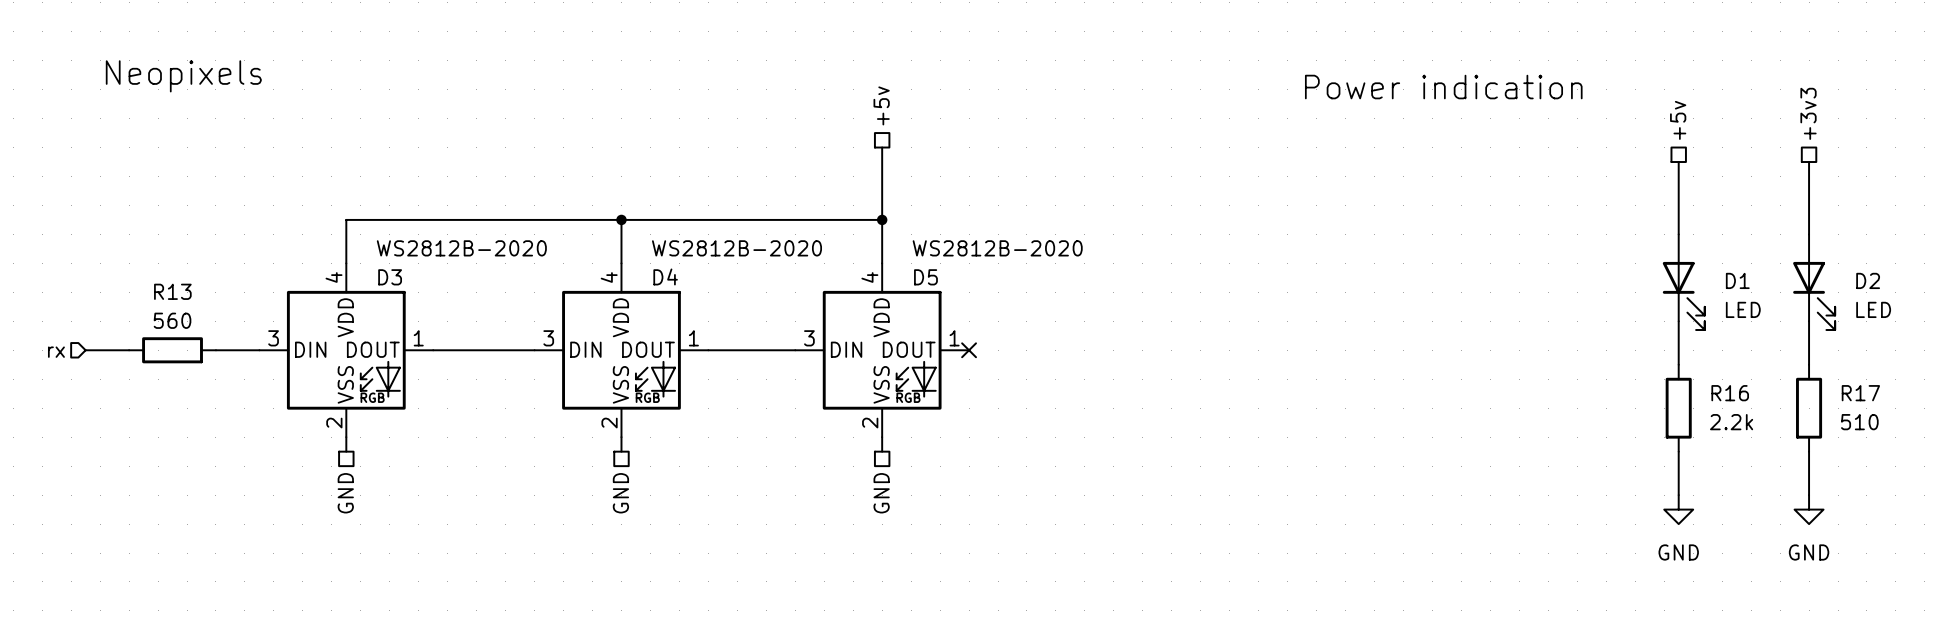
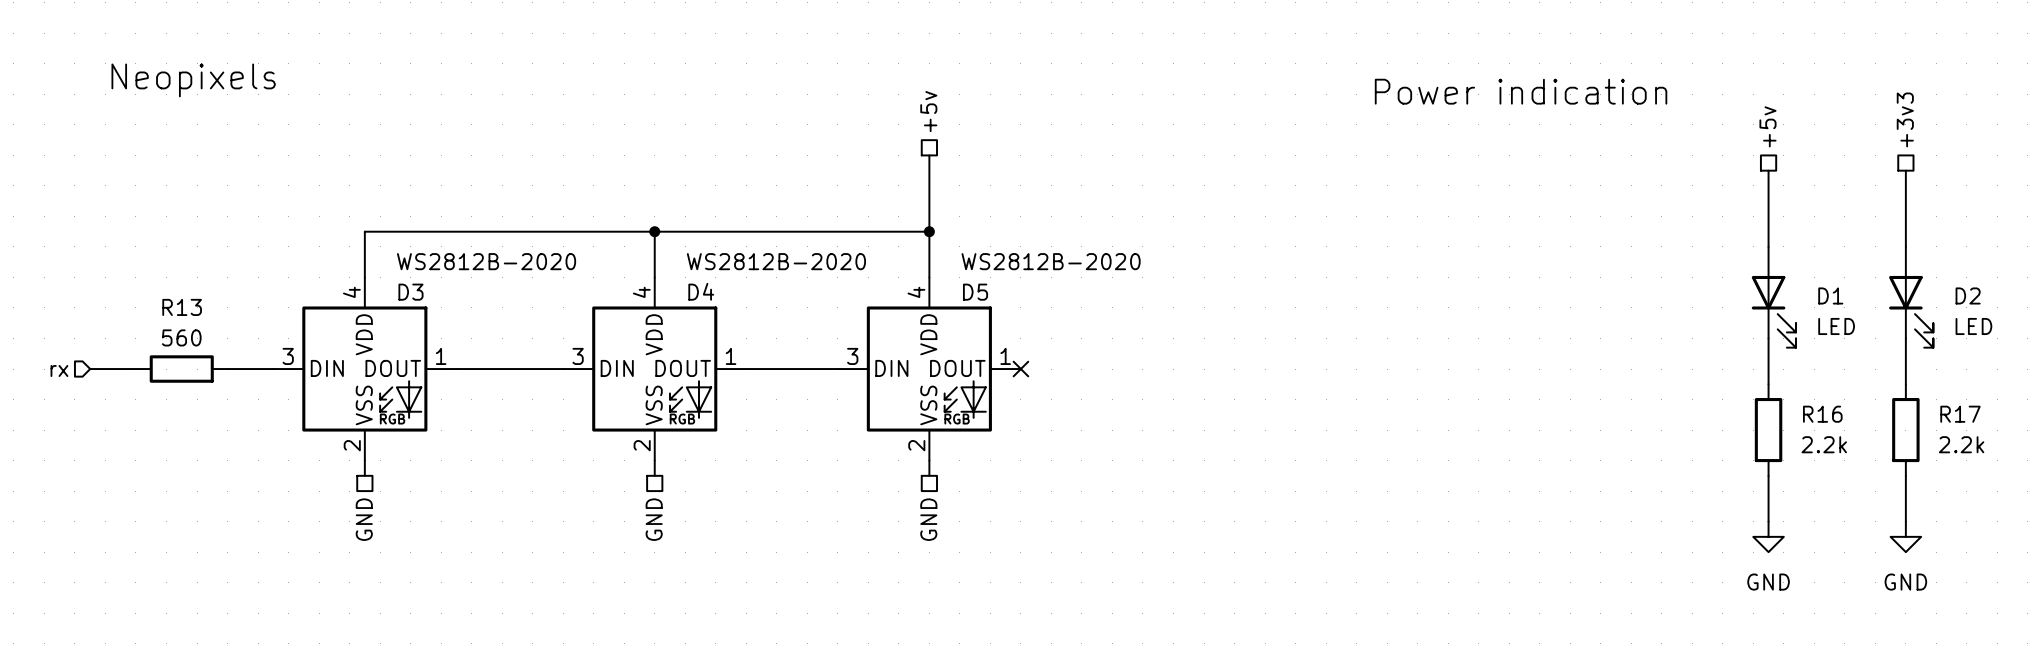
R17 value: 510 (1859, 422) -> 2.2k (1961, 444)

